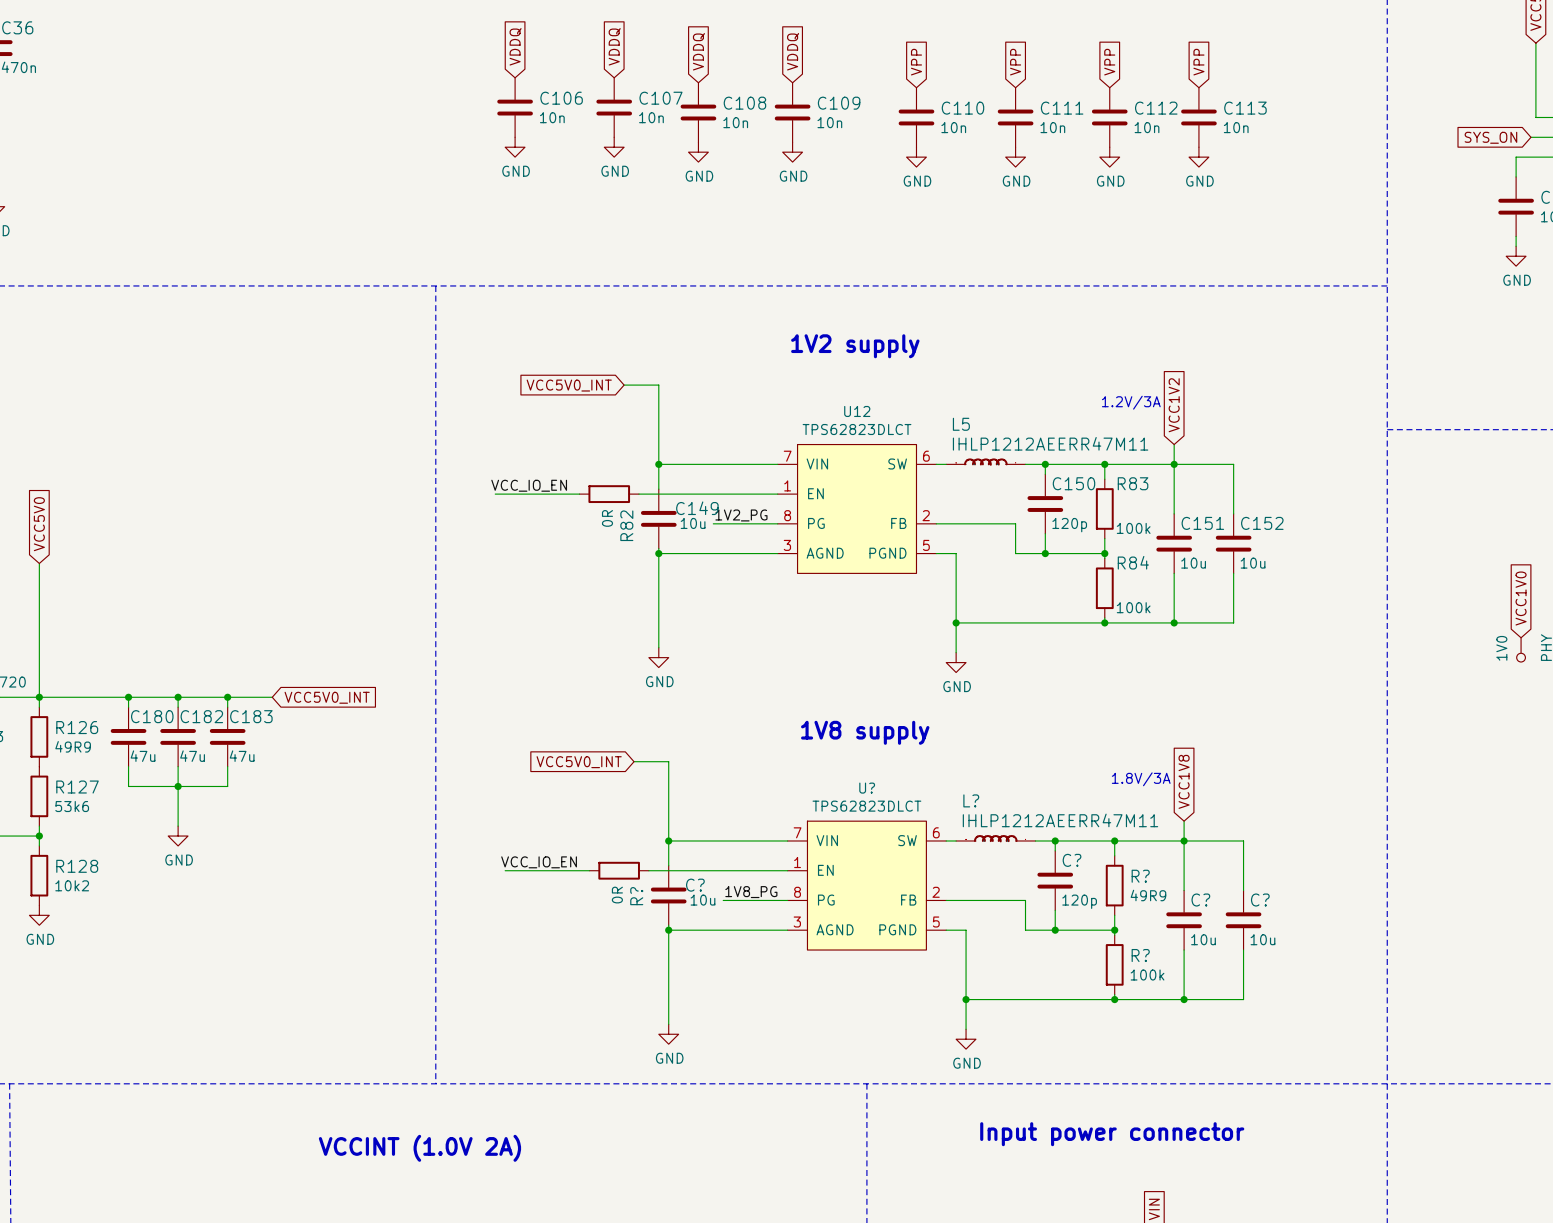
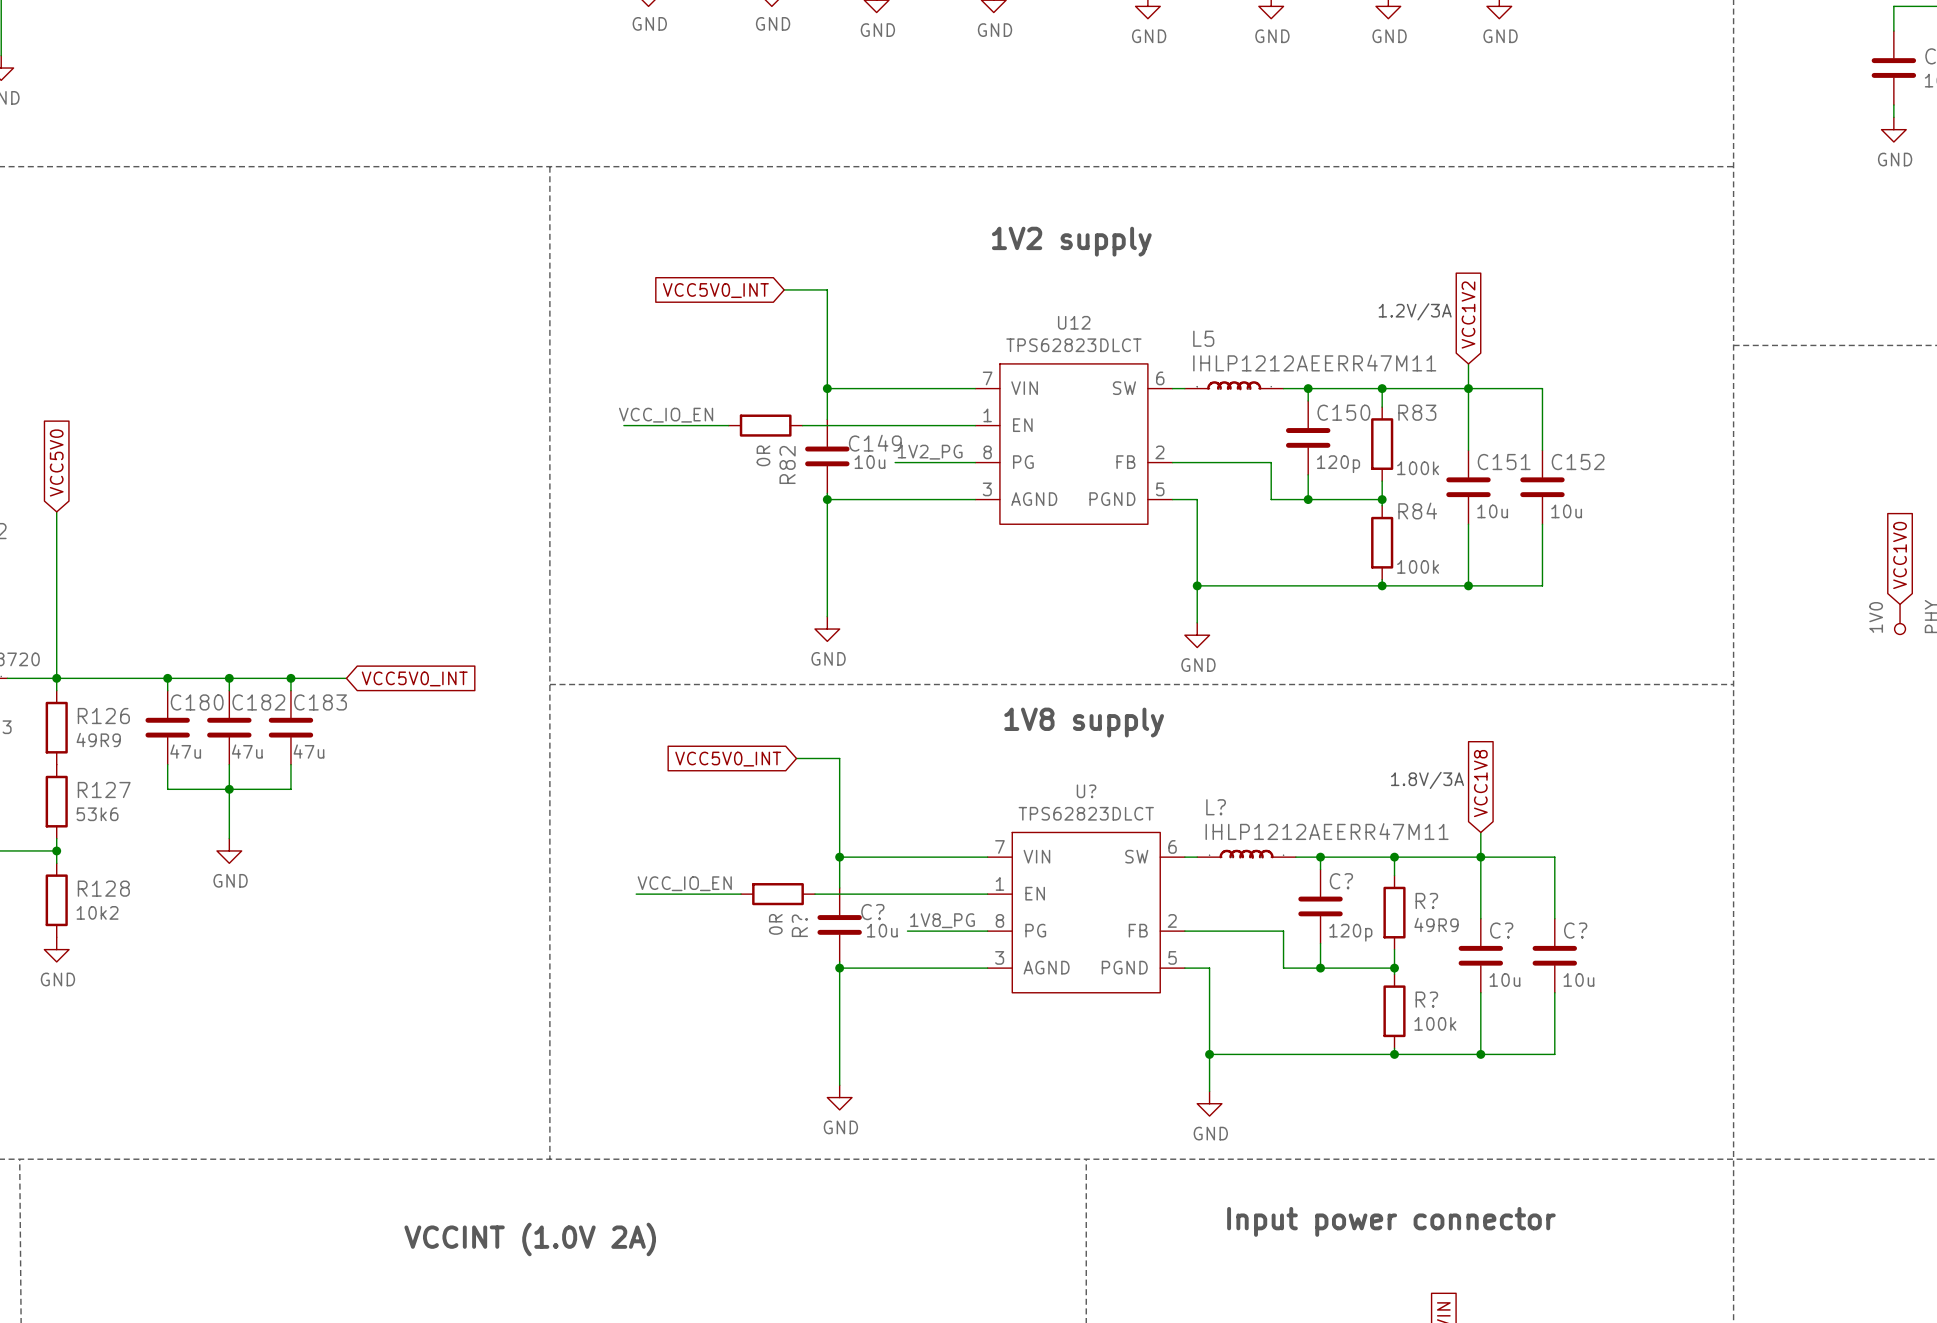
line: none -> (549, 684) (1733, 684)
label position: VCC_IO_EN (539, 862) -> VCC_IO_EN (684, 883)

